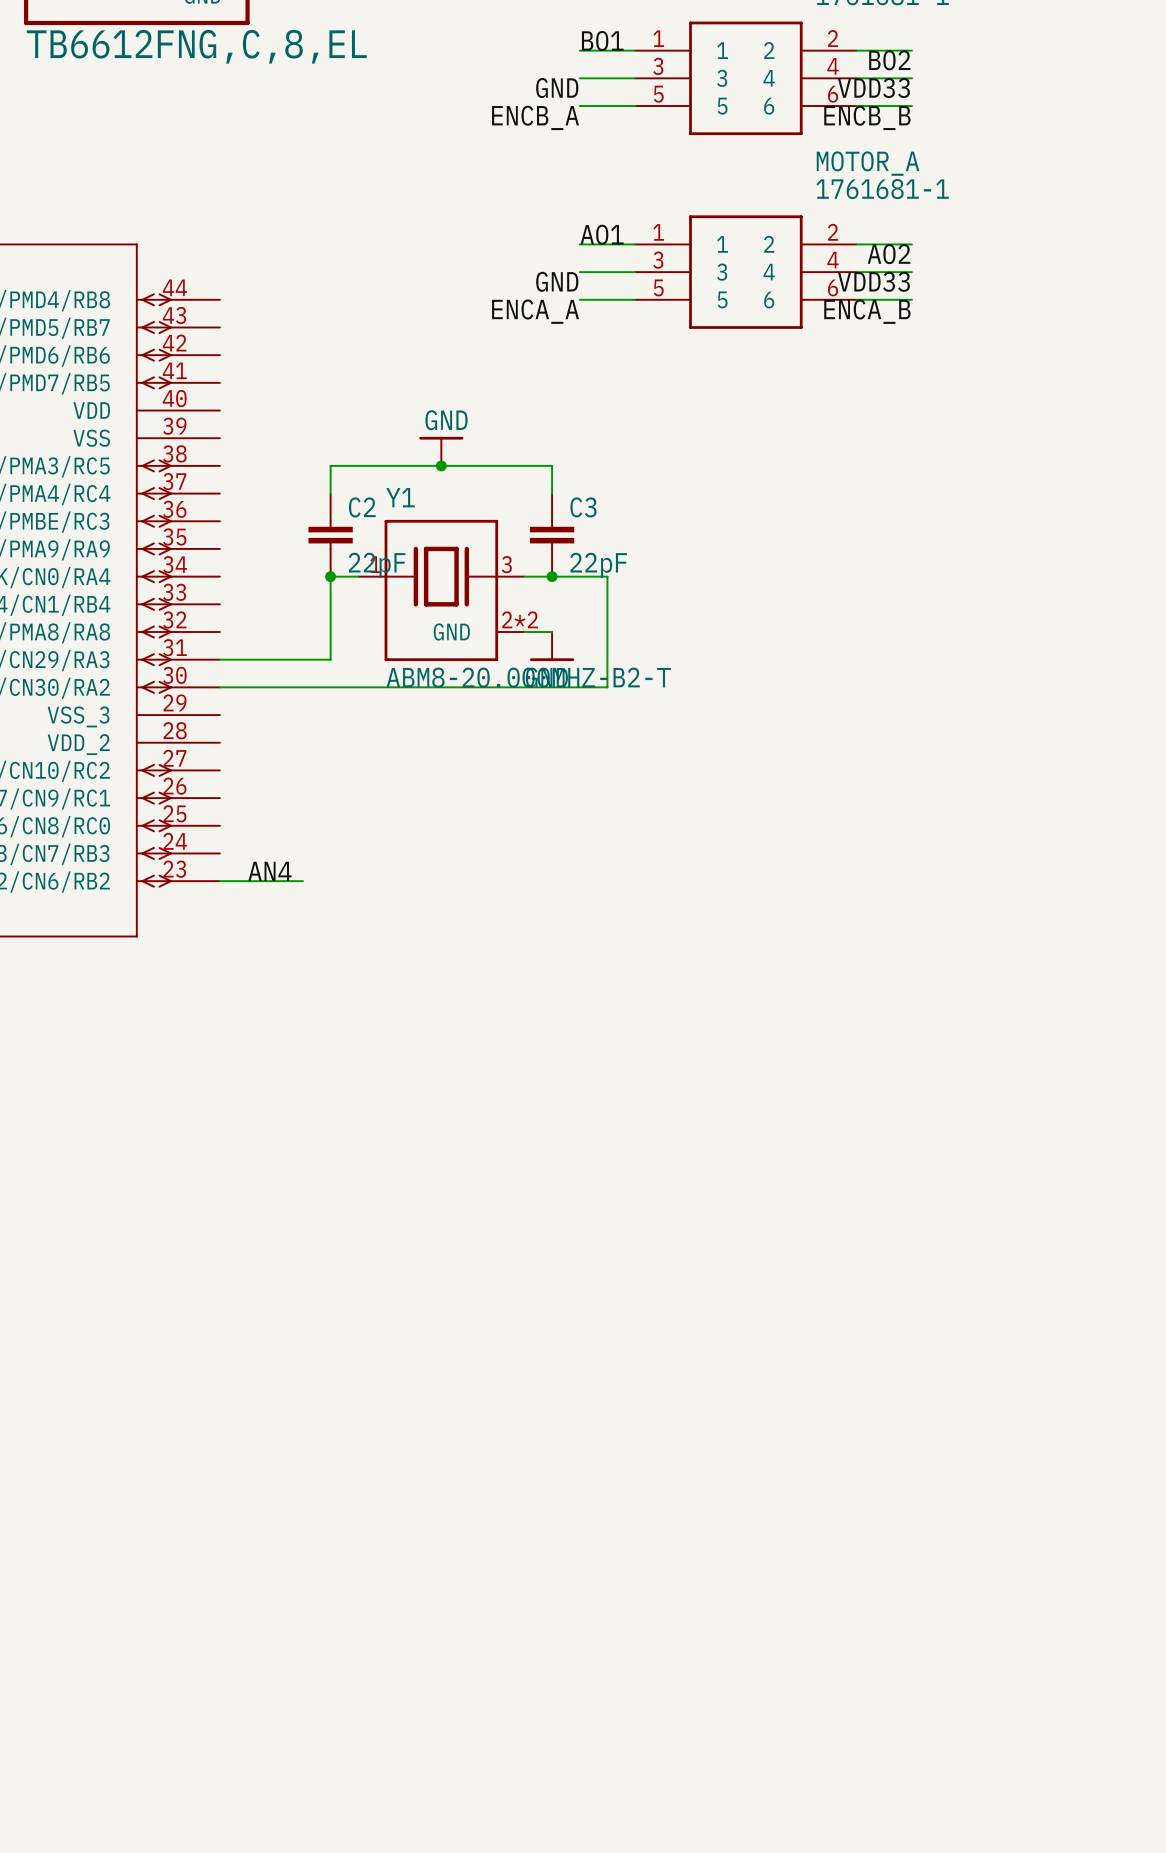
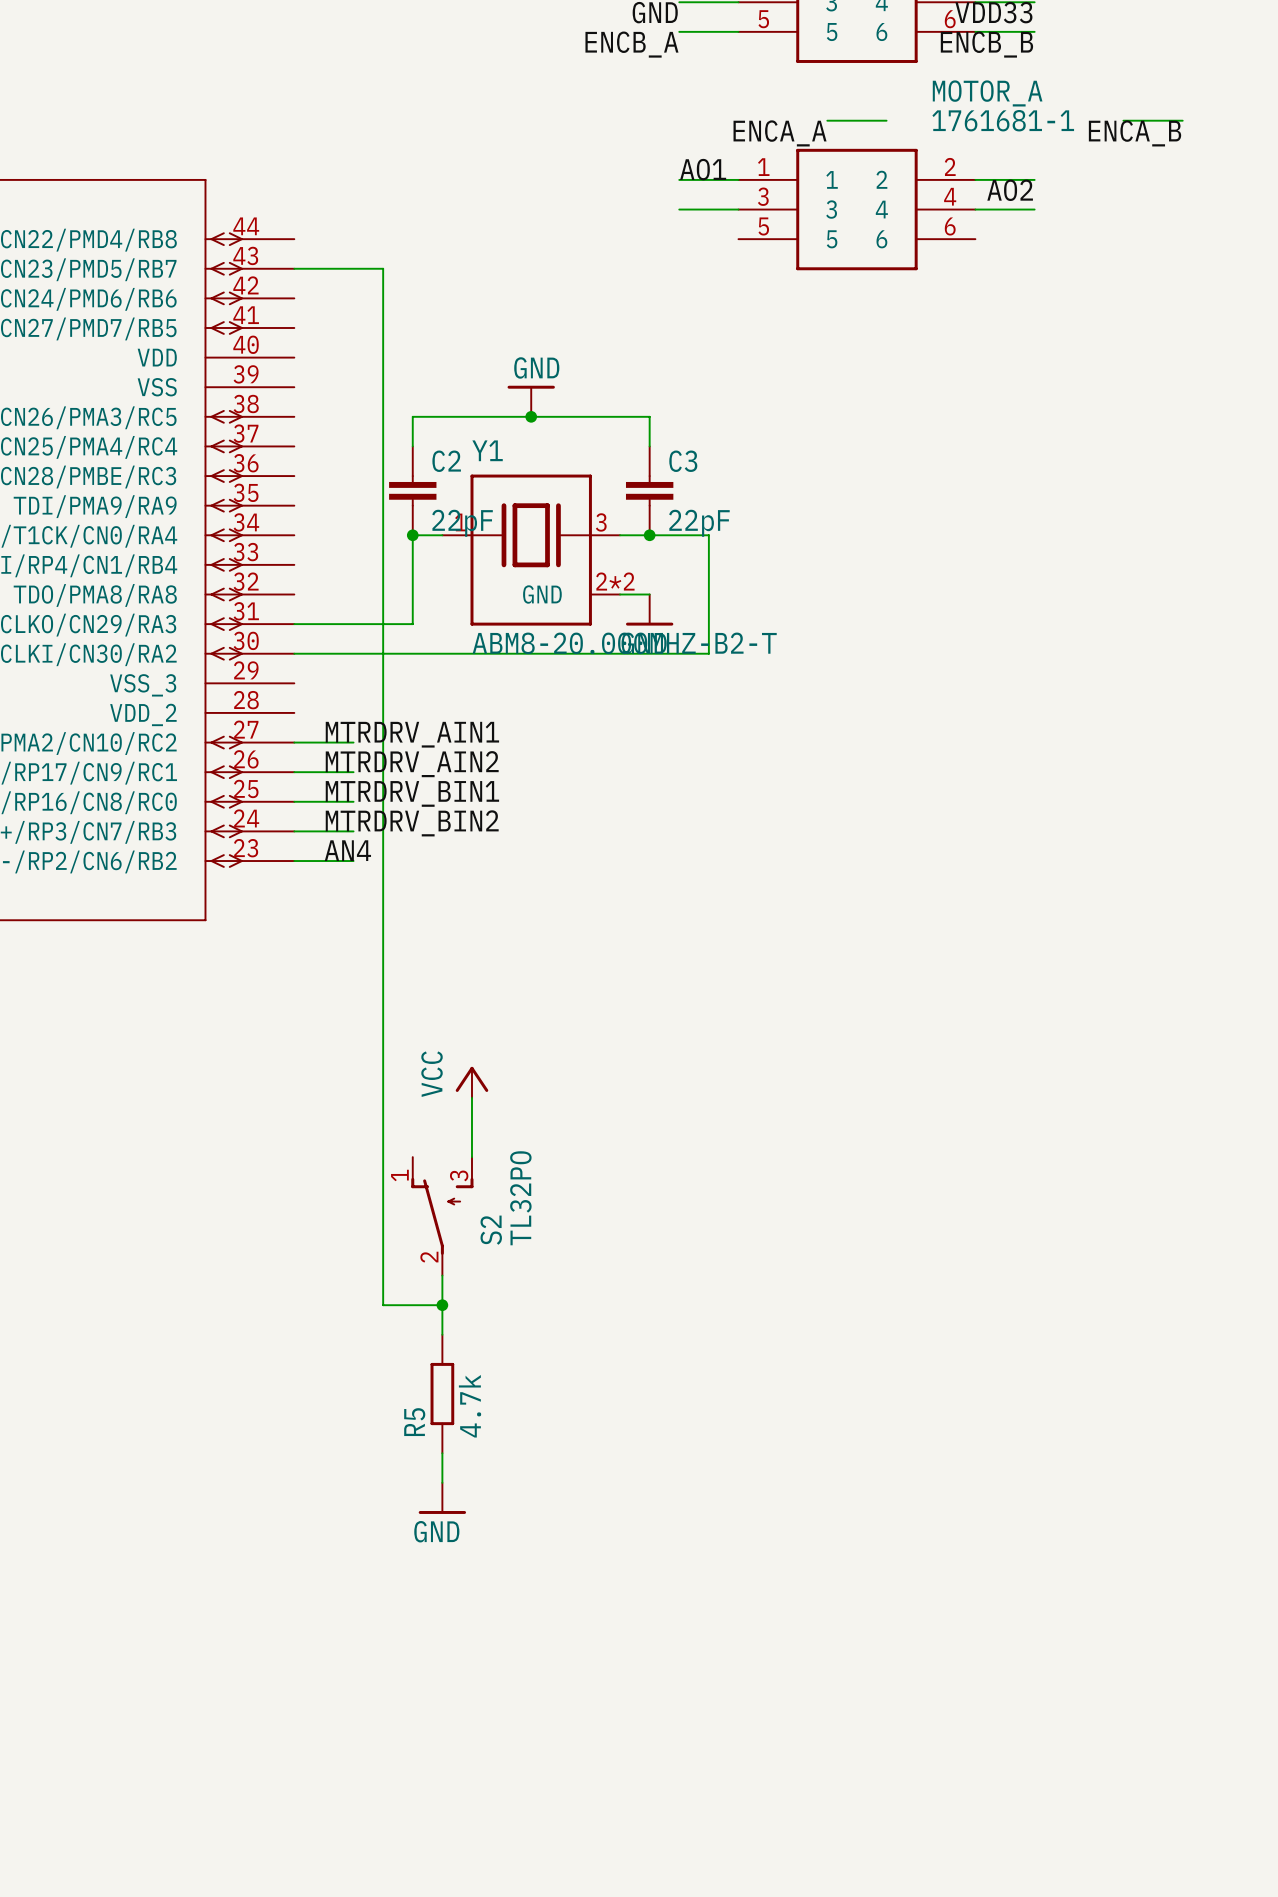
label: GND (557, 281) -> none
label: VDD33 (873, 281) -> none
wire: (579, 299) (635, 299) -> (827, 120) (886, 120)
wire: (856, 299) (911, 299) -> (1123, 120) (1182, 120)
label position: ENCA_A (535, 311) -> ENCA_A (780, 133)
label position: ENCA_B (867, 311) -> ENCA_B (1135, 133)
wire: none -> (294, 268) (383, 268) (383, 1305) (442, 1305)
label: none -> MTRDRV_AIN1 (412, 734)
wire: none -> (294, 742) (353, 742)
label: none -> MTRDRV_AIN2 (412, 764)
wire: none -> (294, 772) (353, 772)
label: none -> MTRDRV_BIN1 (412, 793)
wire: none -> (294, 801) (353, 801)
label: none -> MTRDRV_BIN2 (412, 823)
wire: none -> (294, 831) (353, 831)
wire: (275, 881) (302, 881) -> none
power symbol: none -> VCC (471, 1082)
wire: none -> (471, 1097) (471, 1157)
S2: none -> TL32PO (442, 1216)
wire: none -> (442, 1275) (442, 1334)
junction: none -> (442, 1305)
R5: none -> 4.7k (442, 1394)
wire: none -> (442, 1453) (442, 1482)
power symbol: none -> GND (442, 1498)

